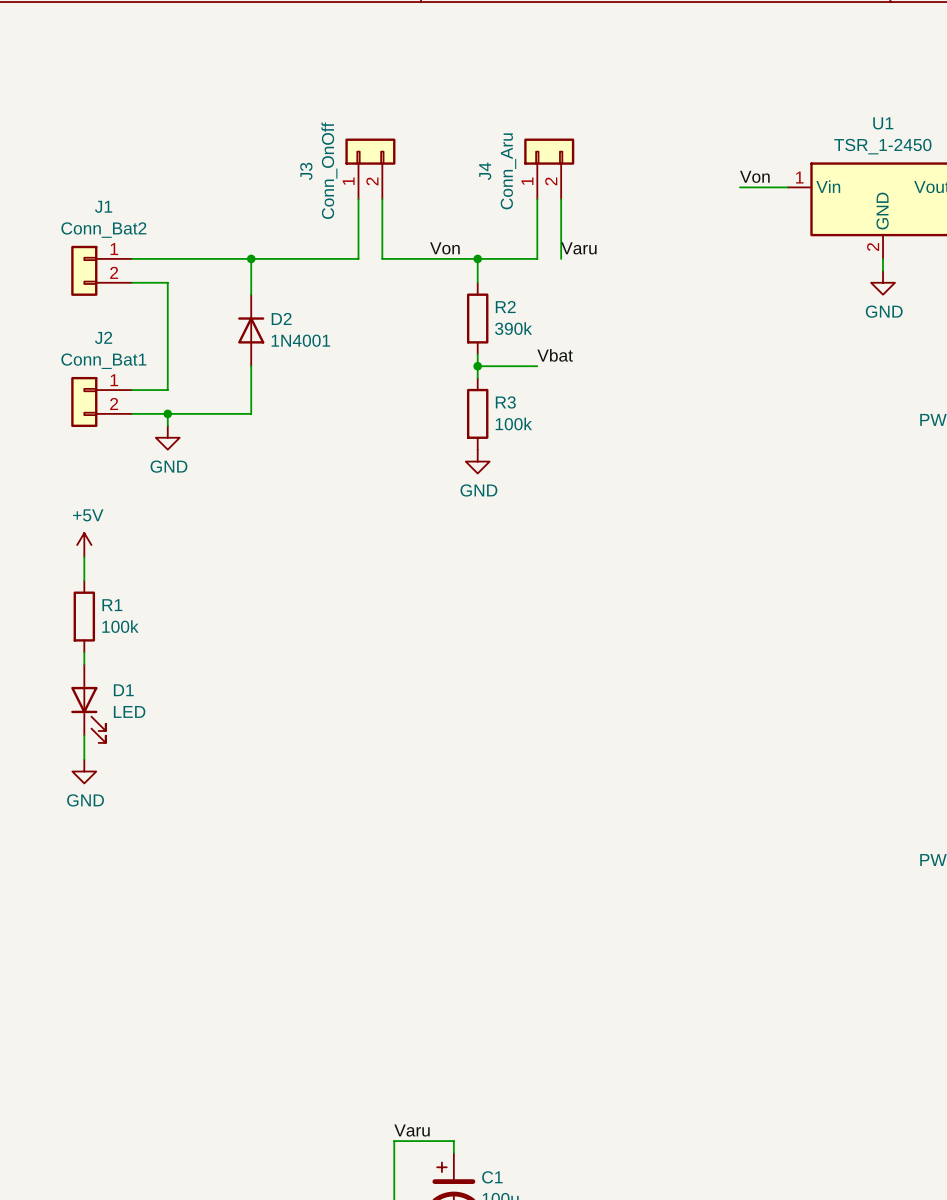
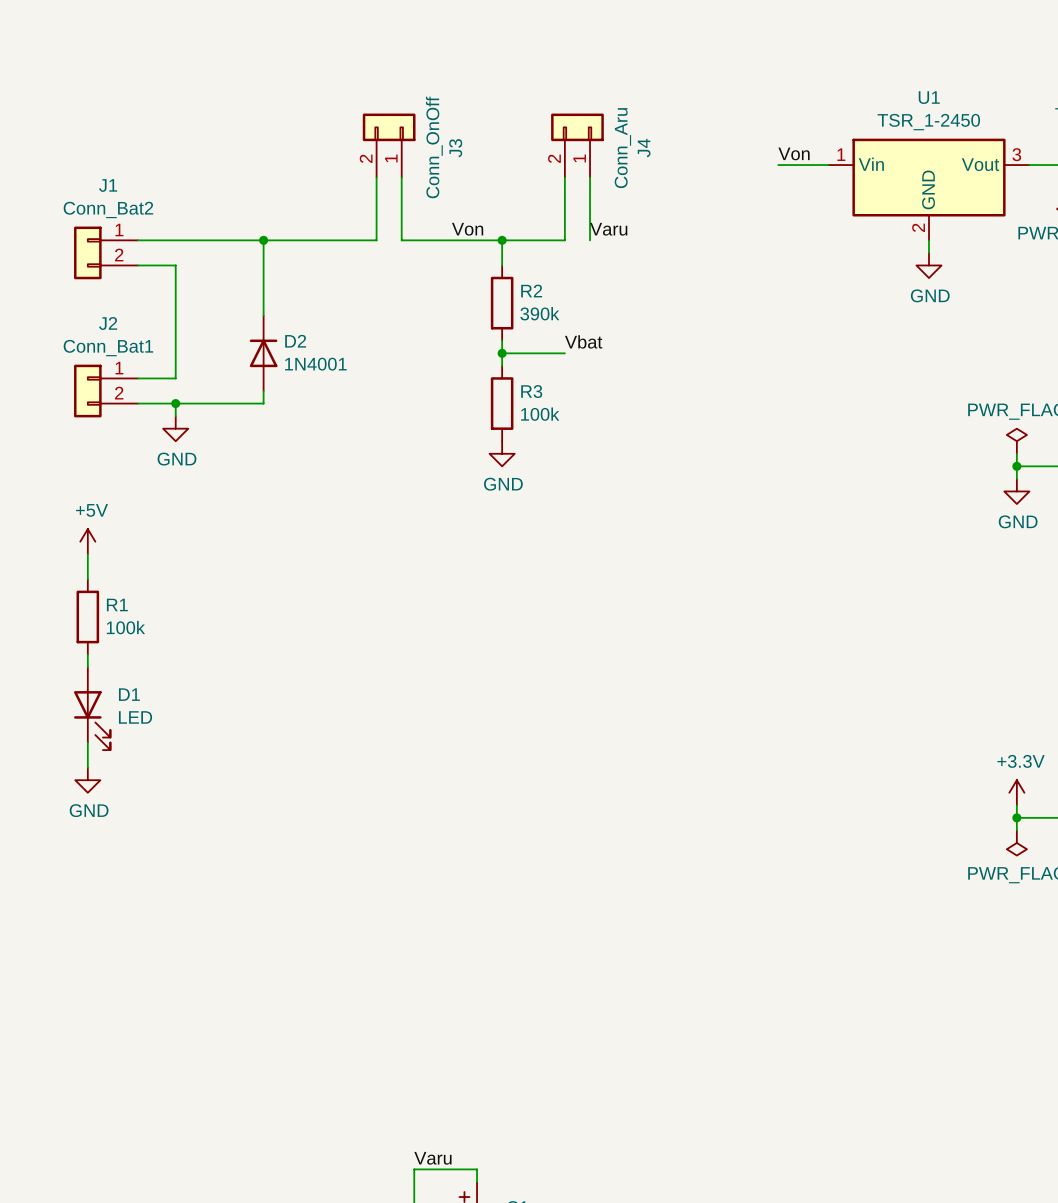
J3 flip: as is (370, 151) -> left-right (389, 127)
J4 flip: as is (549, 151) -> left-right (577, 127)
D2 position: (251, 330) -> (263, 353)

